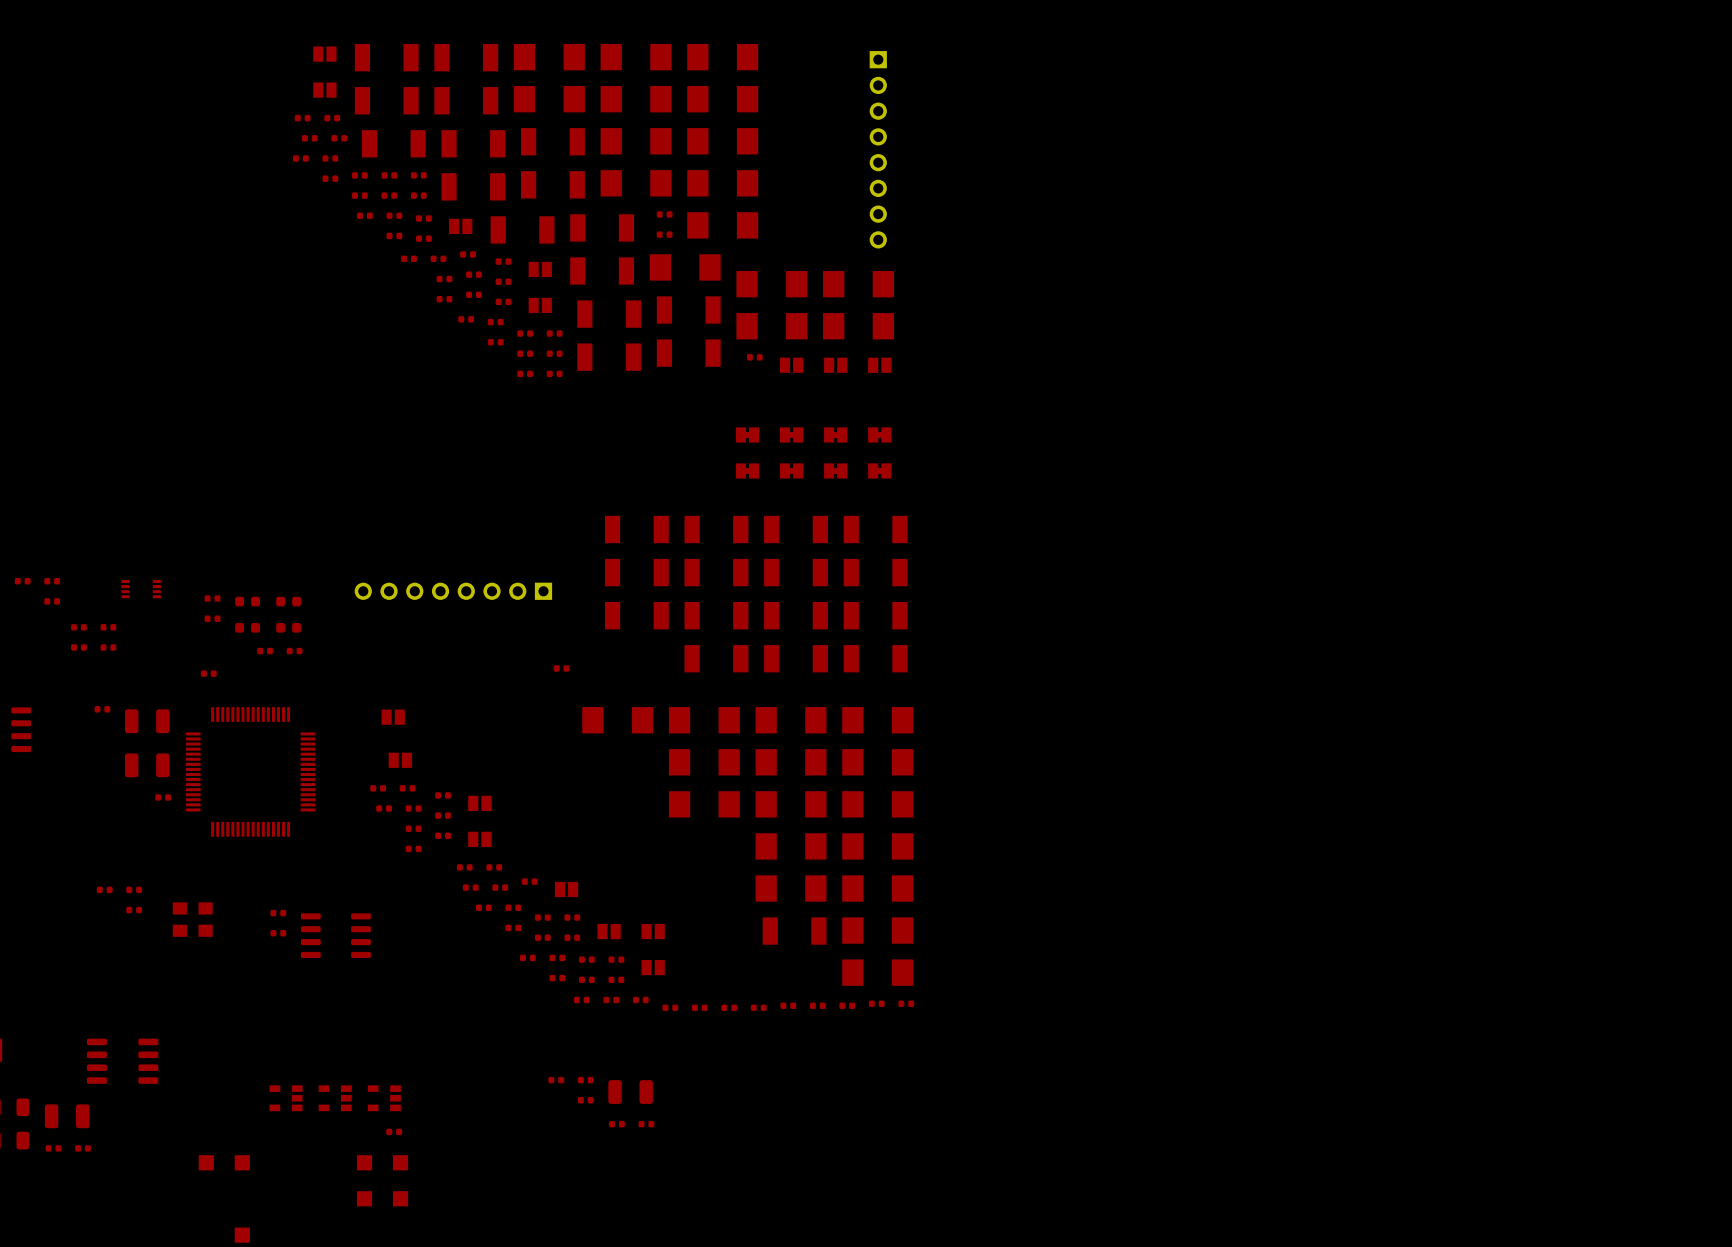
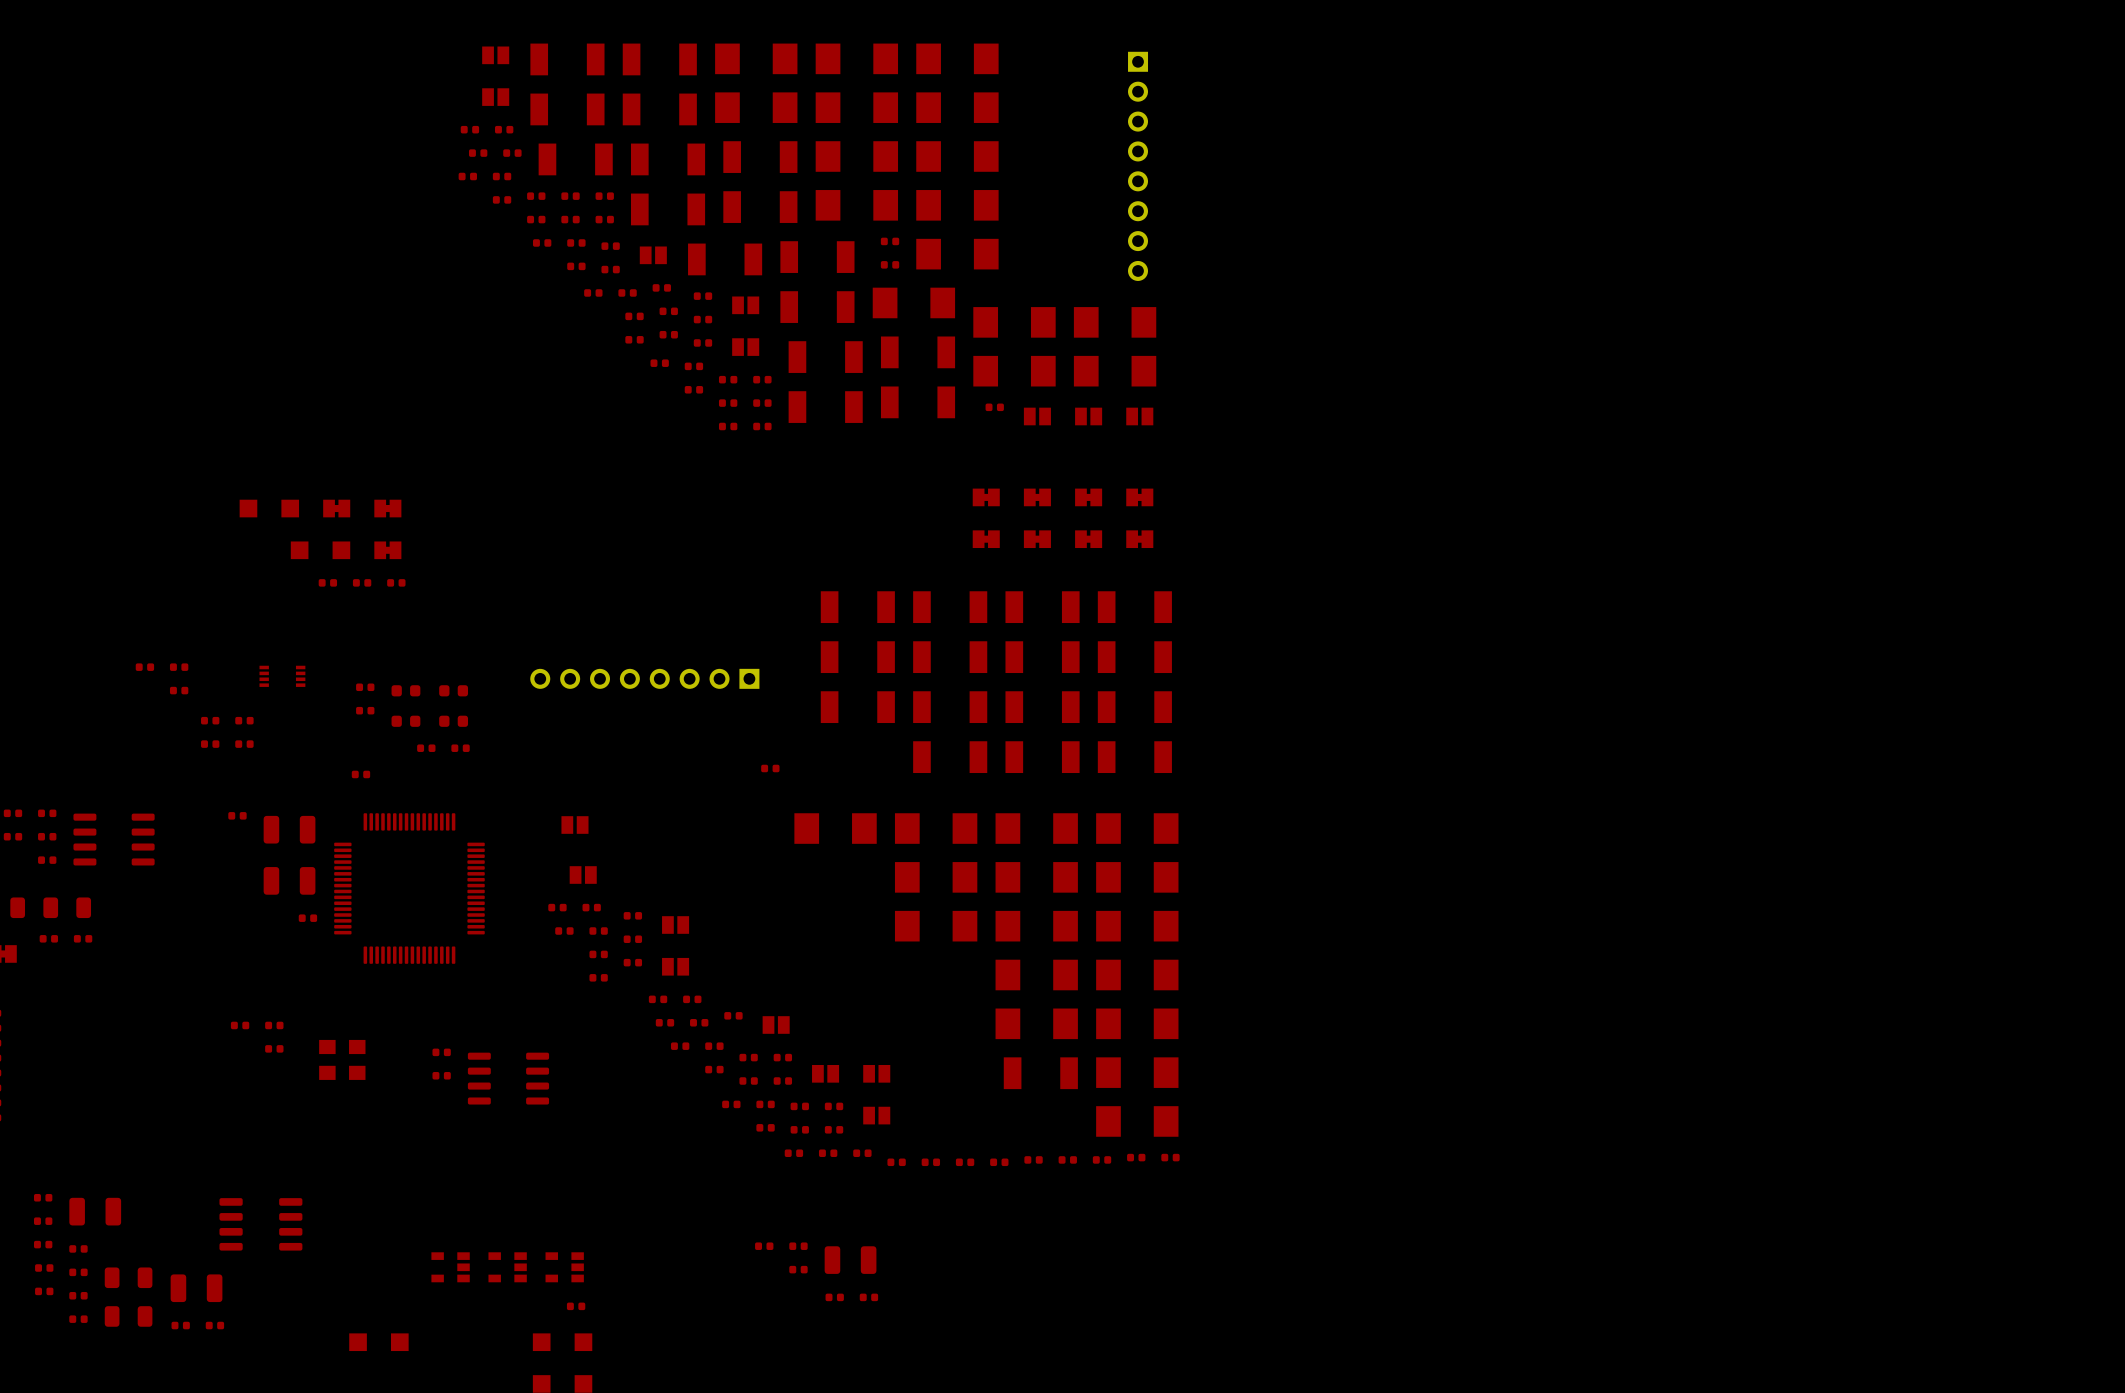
part: none -> (248, 508)
part: none -> (290, 508)
part: none -> (336, 508)
part: none -> (387, 508)
part: none -> (299, 550)
part: none -> (341, 550)
part: none -> (387, 550)
part: none -> (327, 582)
part: none -> (362, 582)
part: none -> (396, 582)

